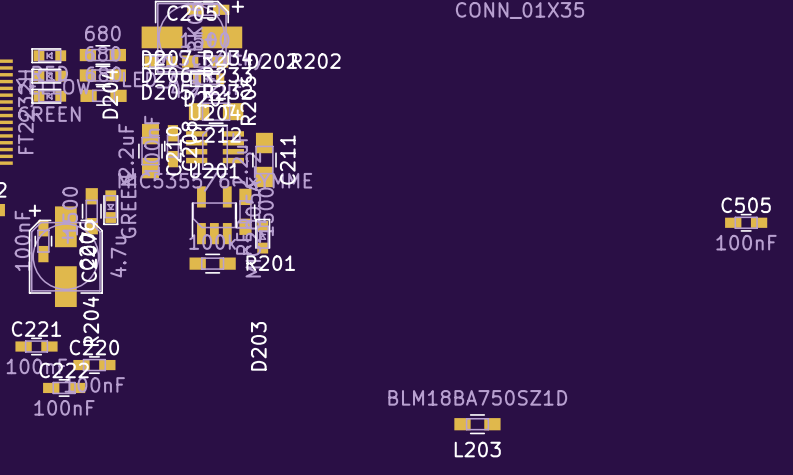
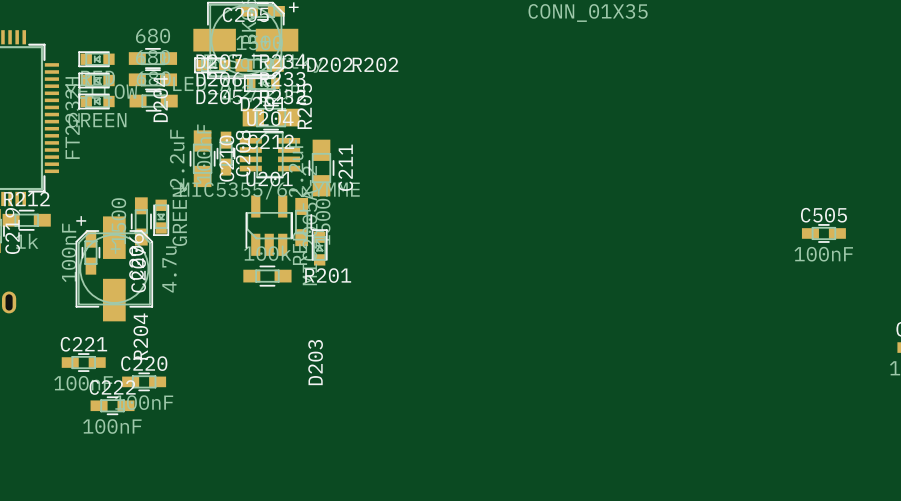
L203: BLM18BA750SZ1D (477, 424) -> none

